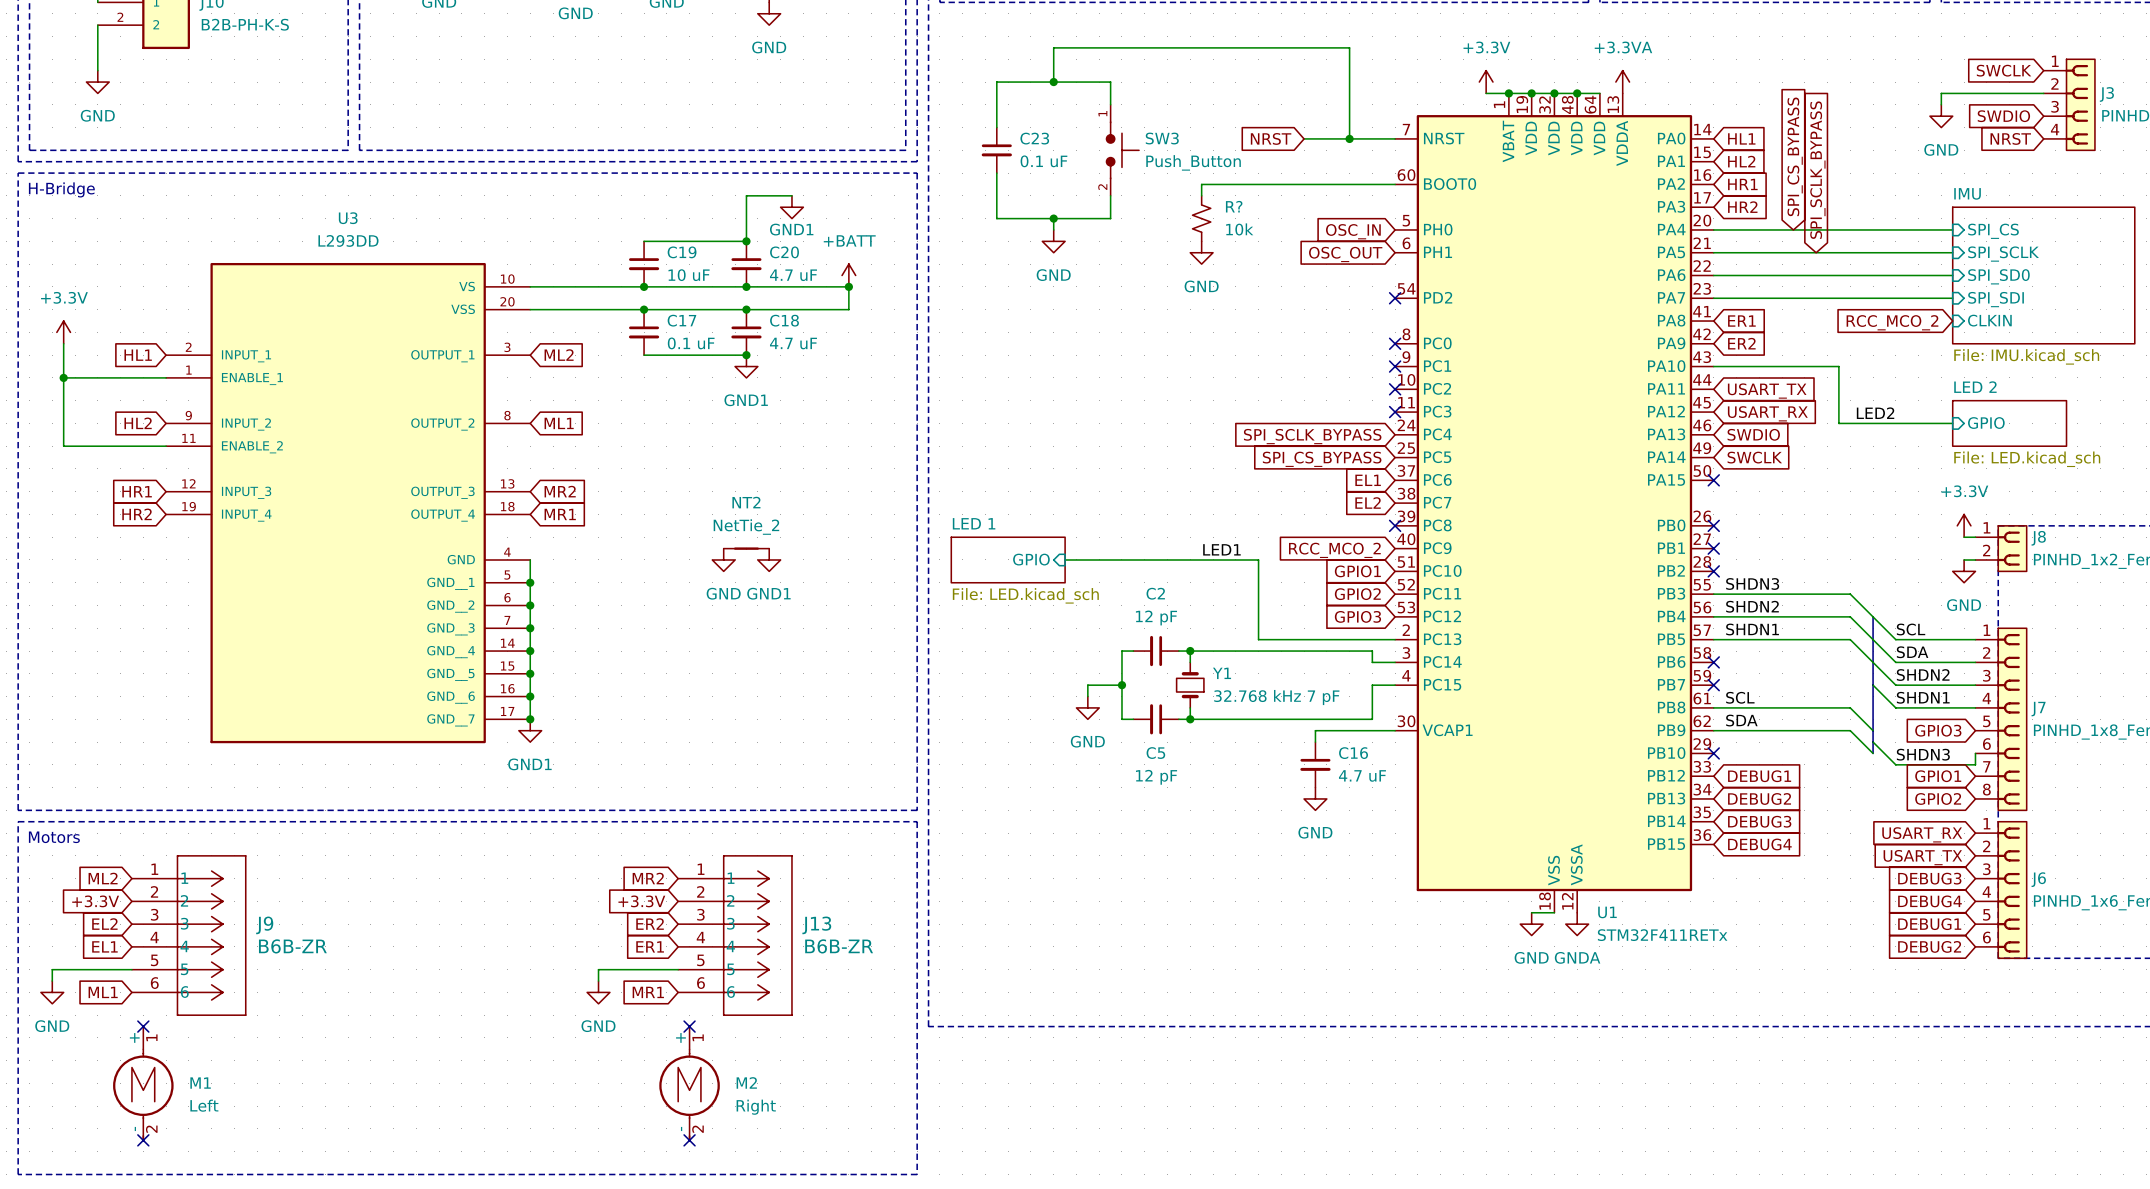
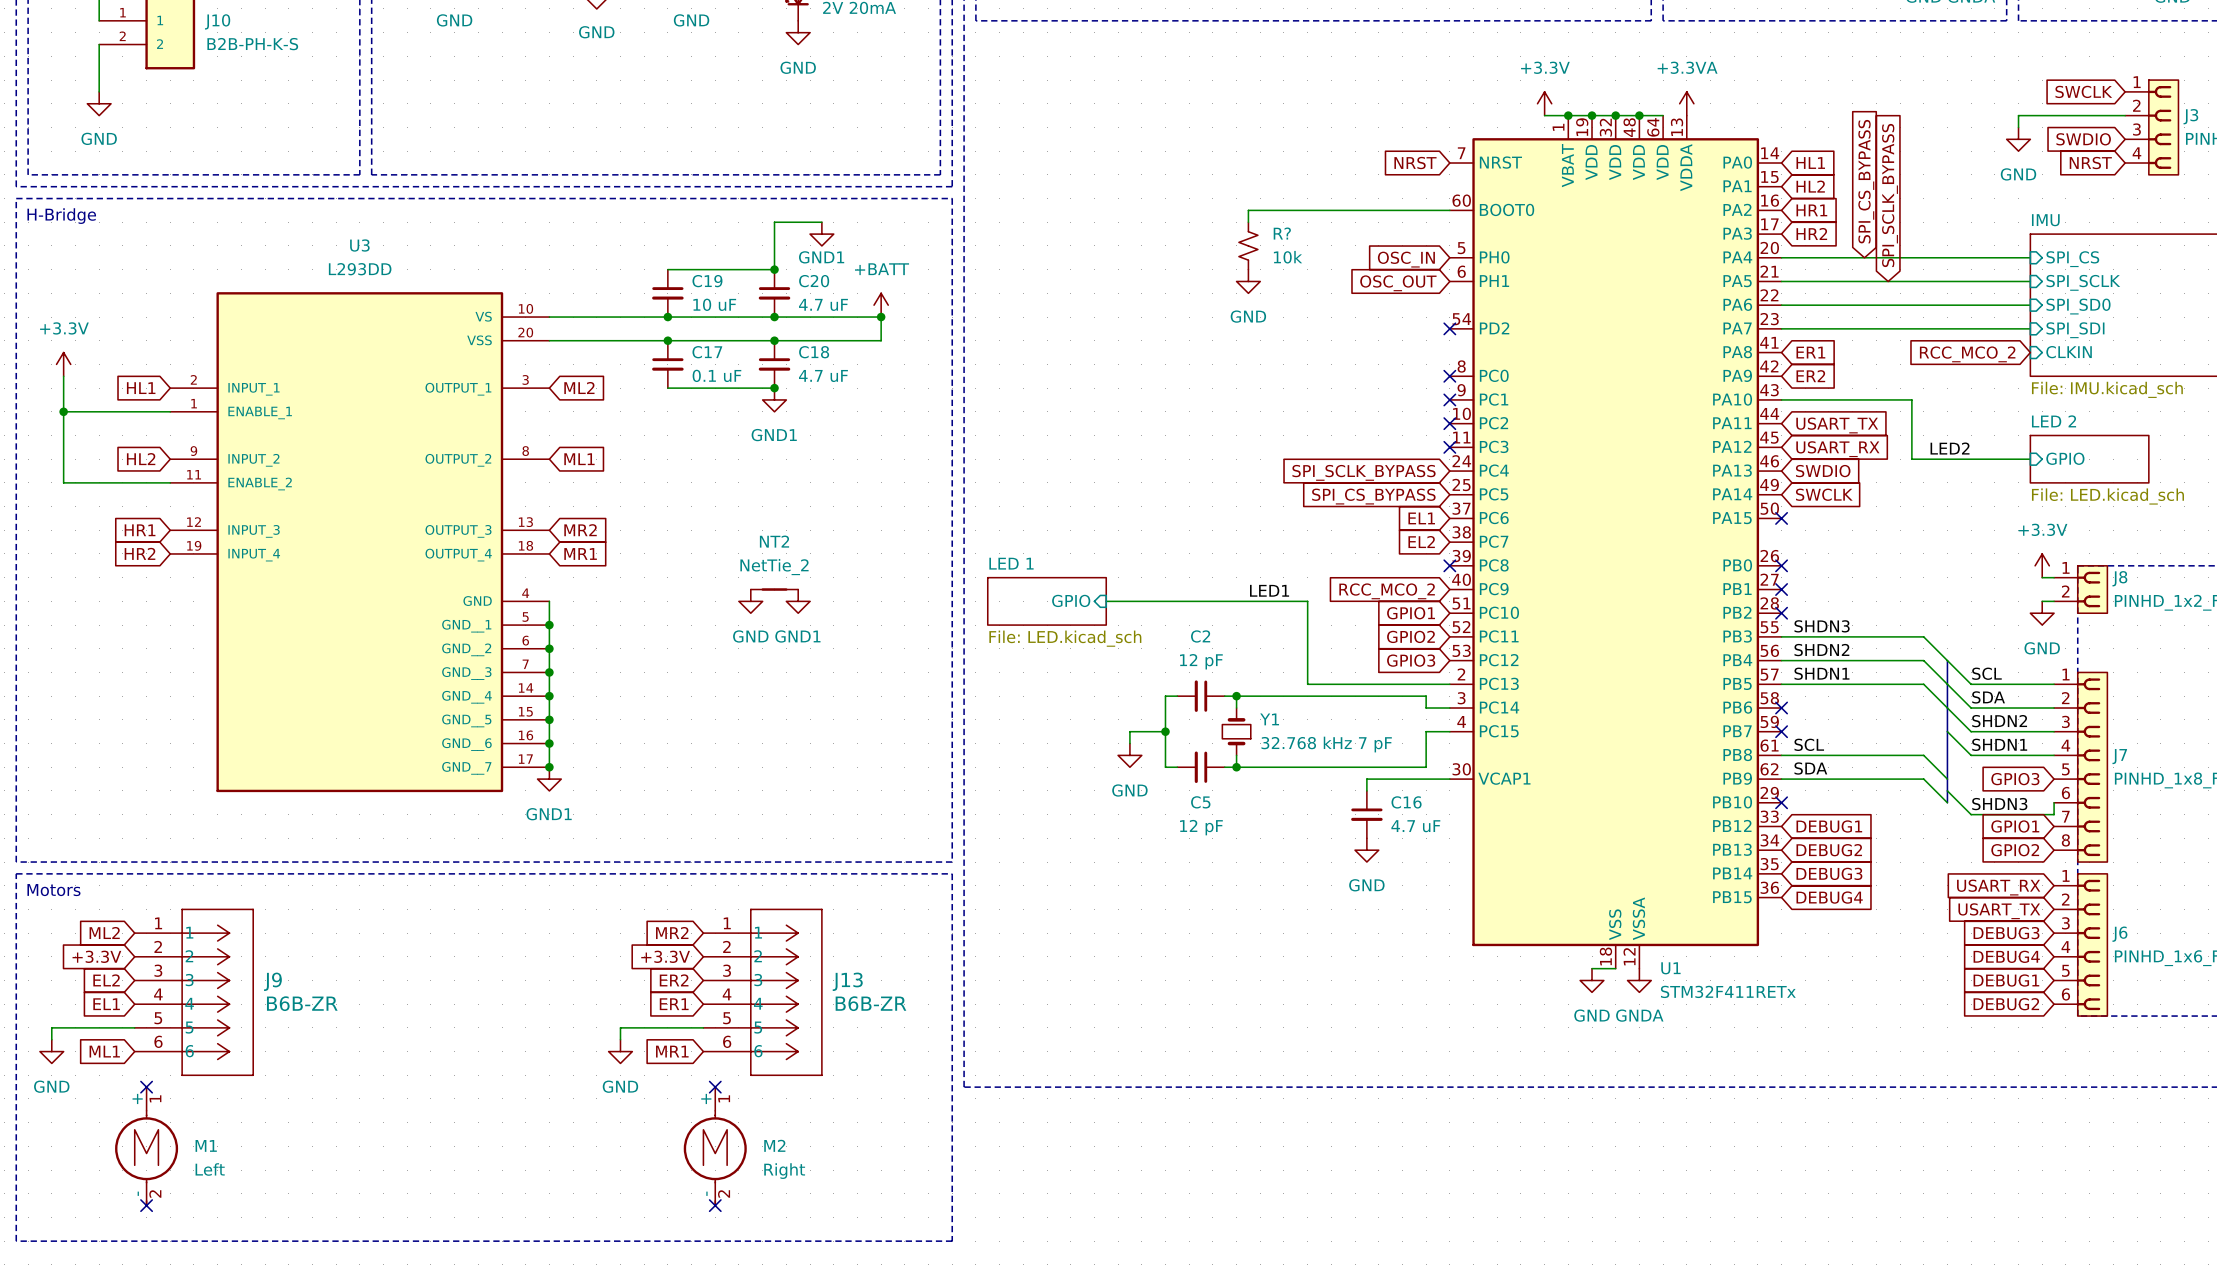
wire: (1053, 82) (1053, 47) (1349, 47) (1349, 138) -> none
junction: (1053, 82) -> none
wire: (1110, 104) (1110, 82) (996, 82) (996, 127) -> none
global label position: NRST (1271, 138) -> NRST (1415, 163)
wire: (1304, 138) (1395, 138) -> none
junction: (1349, 138) -> none
C23: 0.1 uF (996, 150) -> none
SW3: Push_Button (1122, 150) -> none
wire: (996, 173) (996, 218) (1110, 218) (1110, 195) -> none
wire: (1053, 218) (1053, 229) -> none
junction: (1053, 218) -> none
power symbol: GND (1053, 241) -> none

